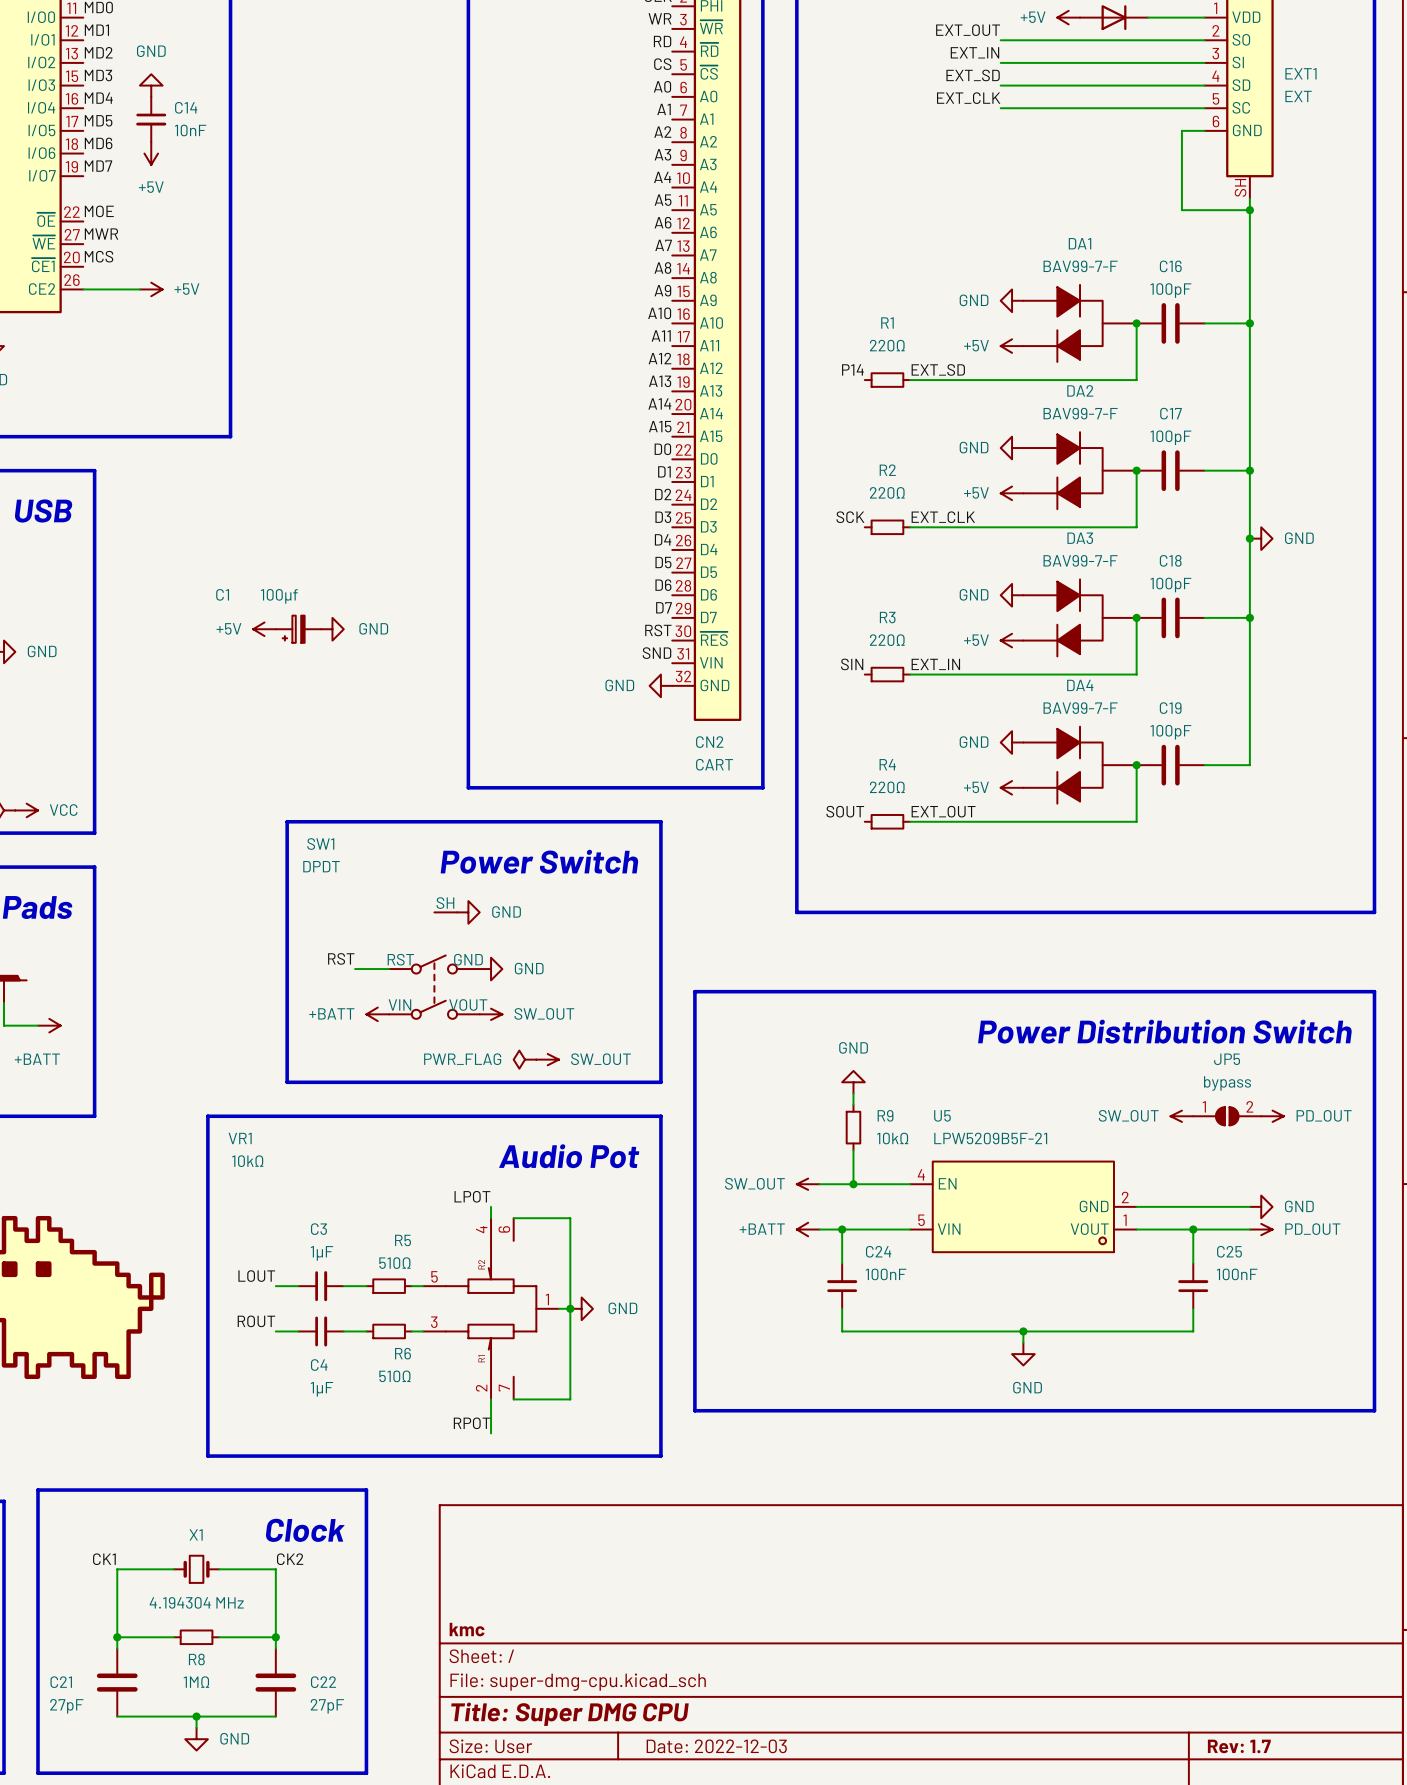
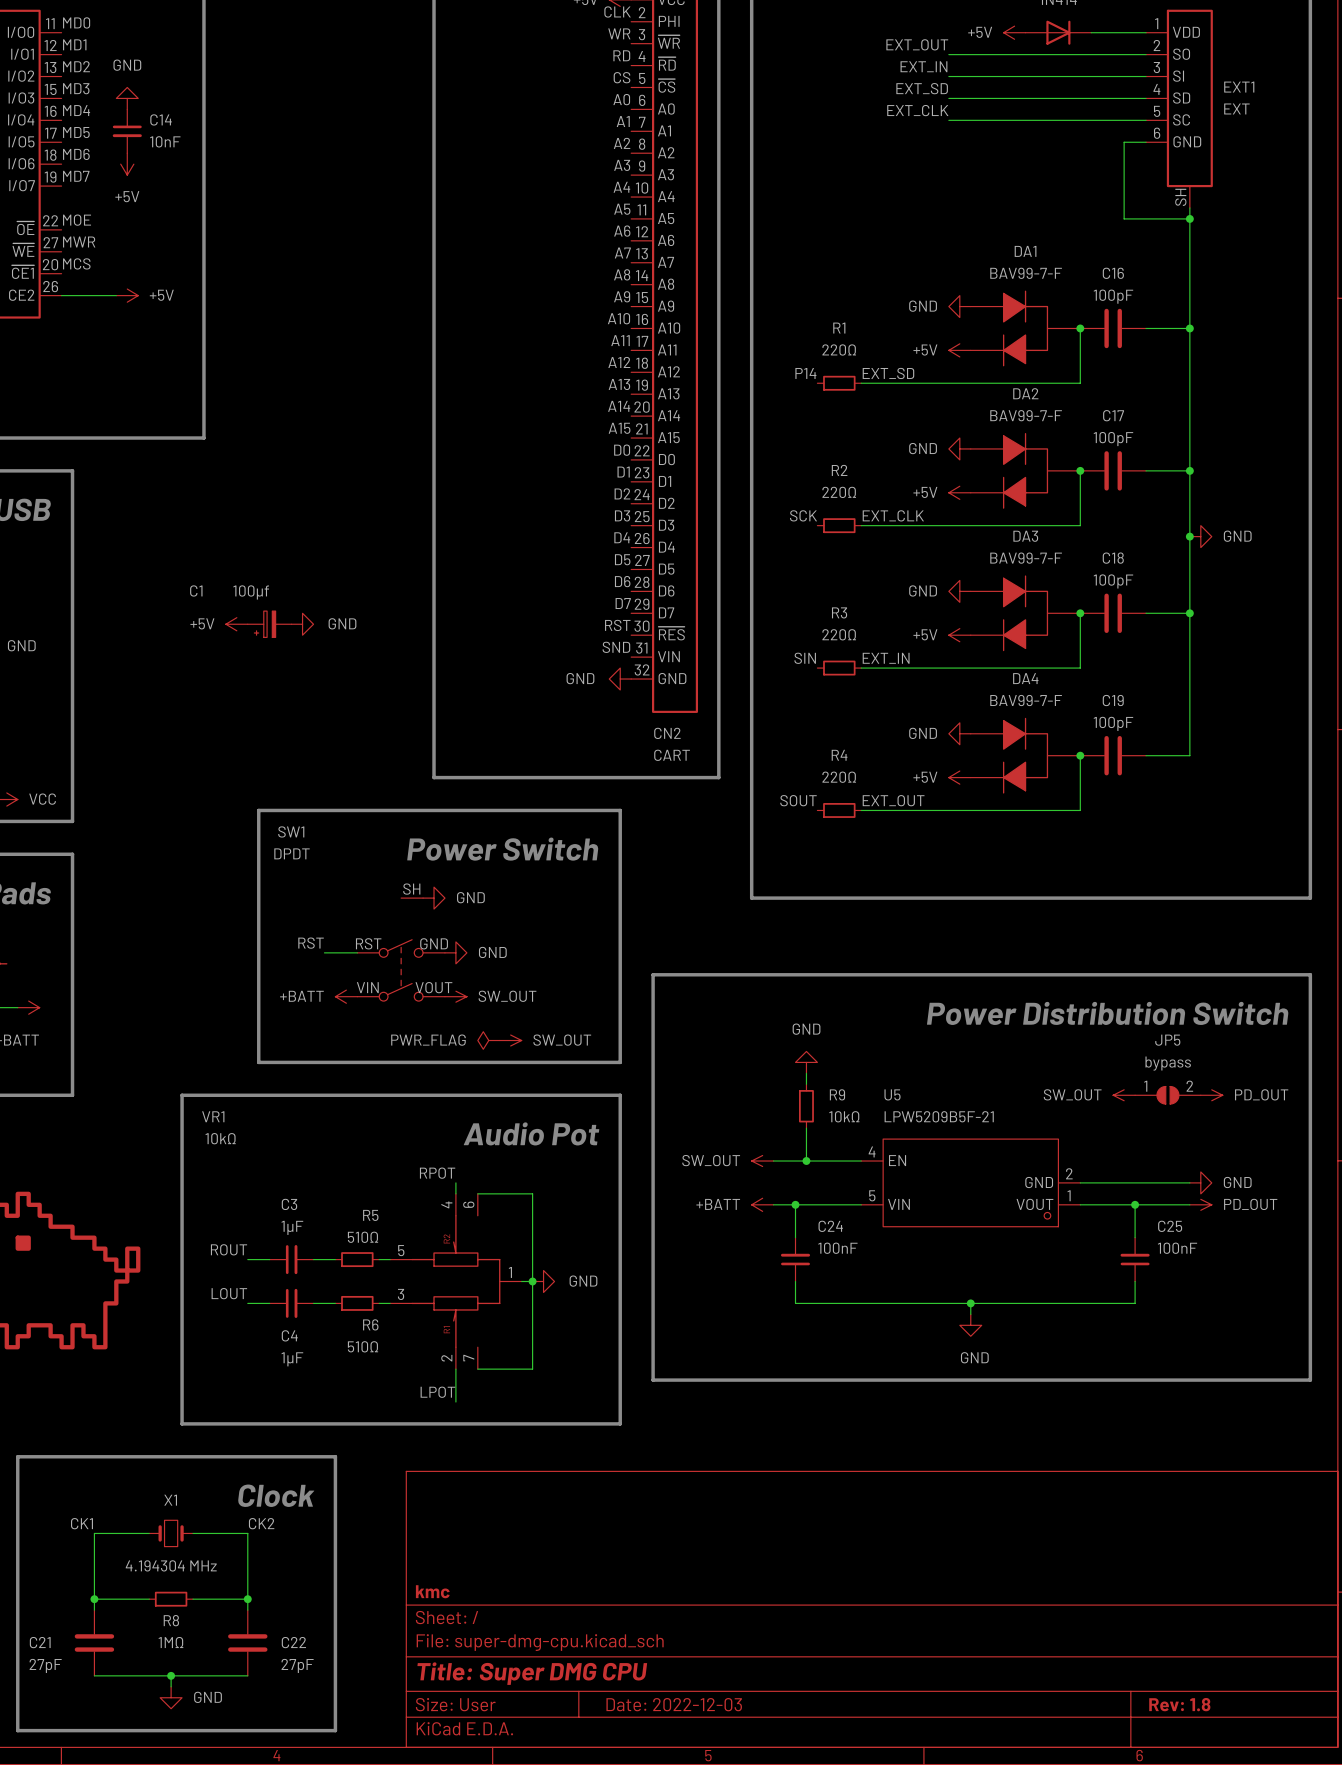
label: LPOT (472, 1196) -> RPOT (437, 1173)
label: LOUT (256, 1276) -> ROUT (229, 1249)
label: ROUT (256, 1321) -> LOUT (229, 1293)
label: RPOT (472, 1423) -> LPOT (437, 1392)
title block: Rev: 1.7 (1239, 1746) -> Rev: 1.8 (1179, 1704)

